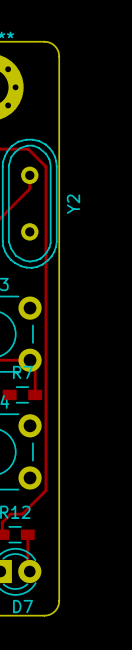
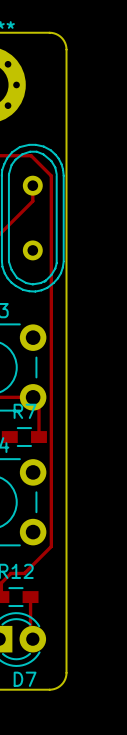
Y2 name: Y2 (73, 204) -> none

